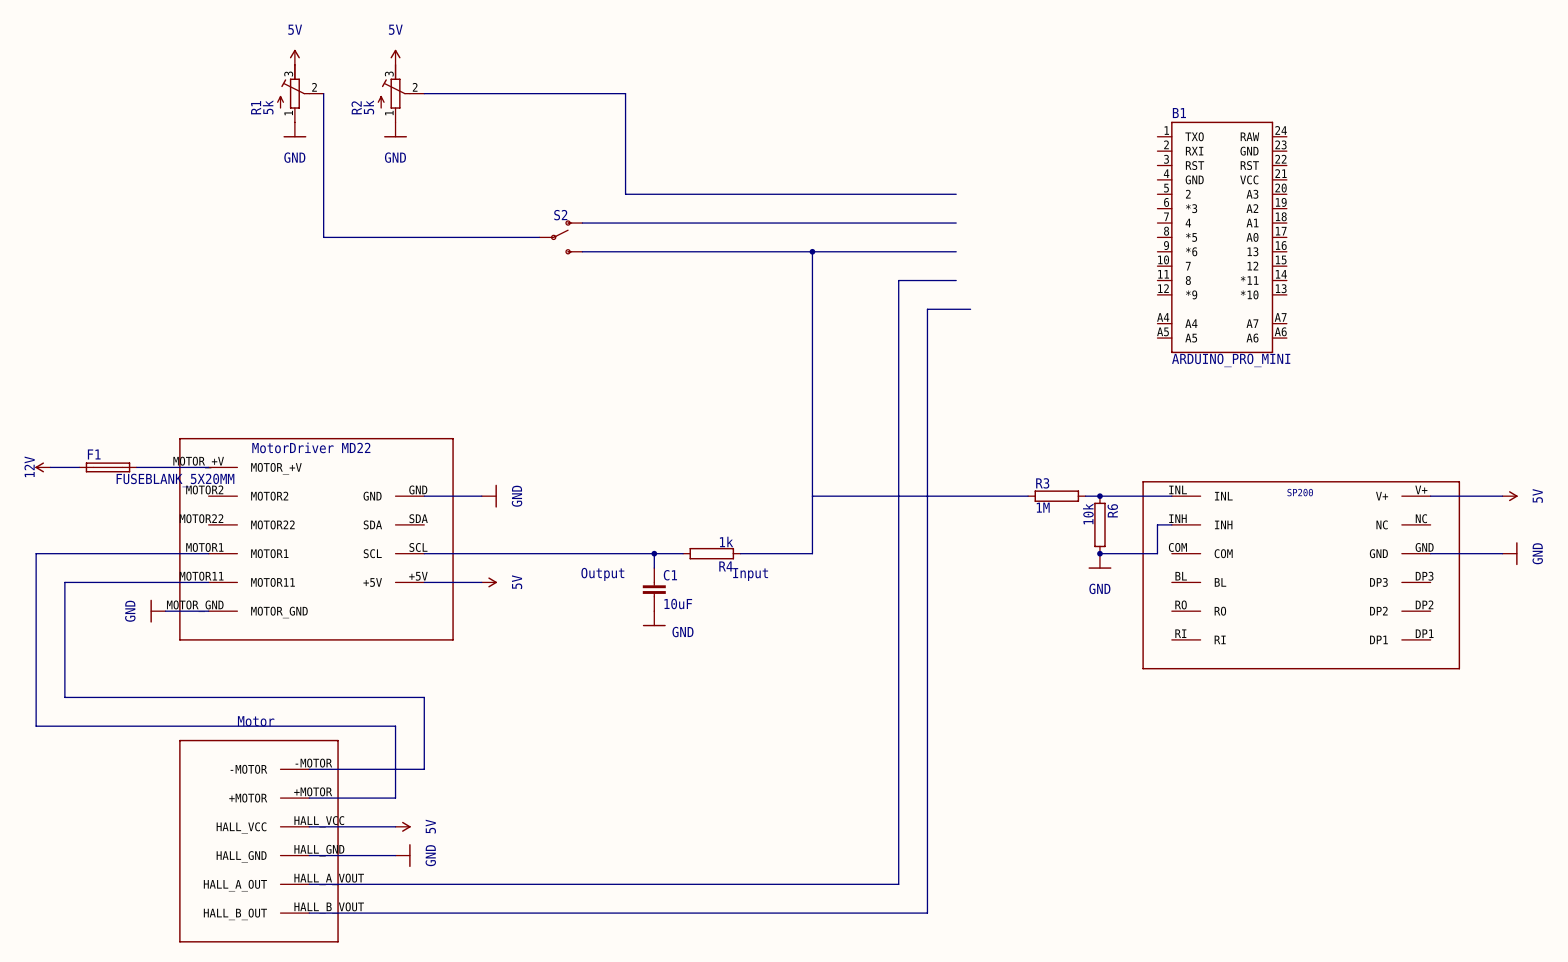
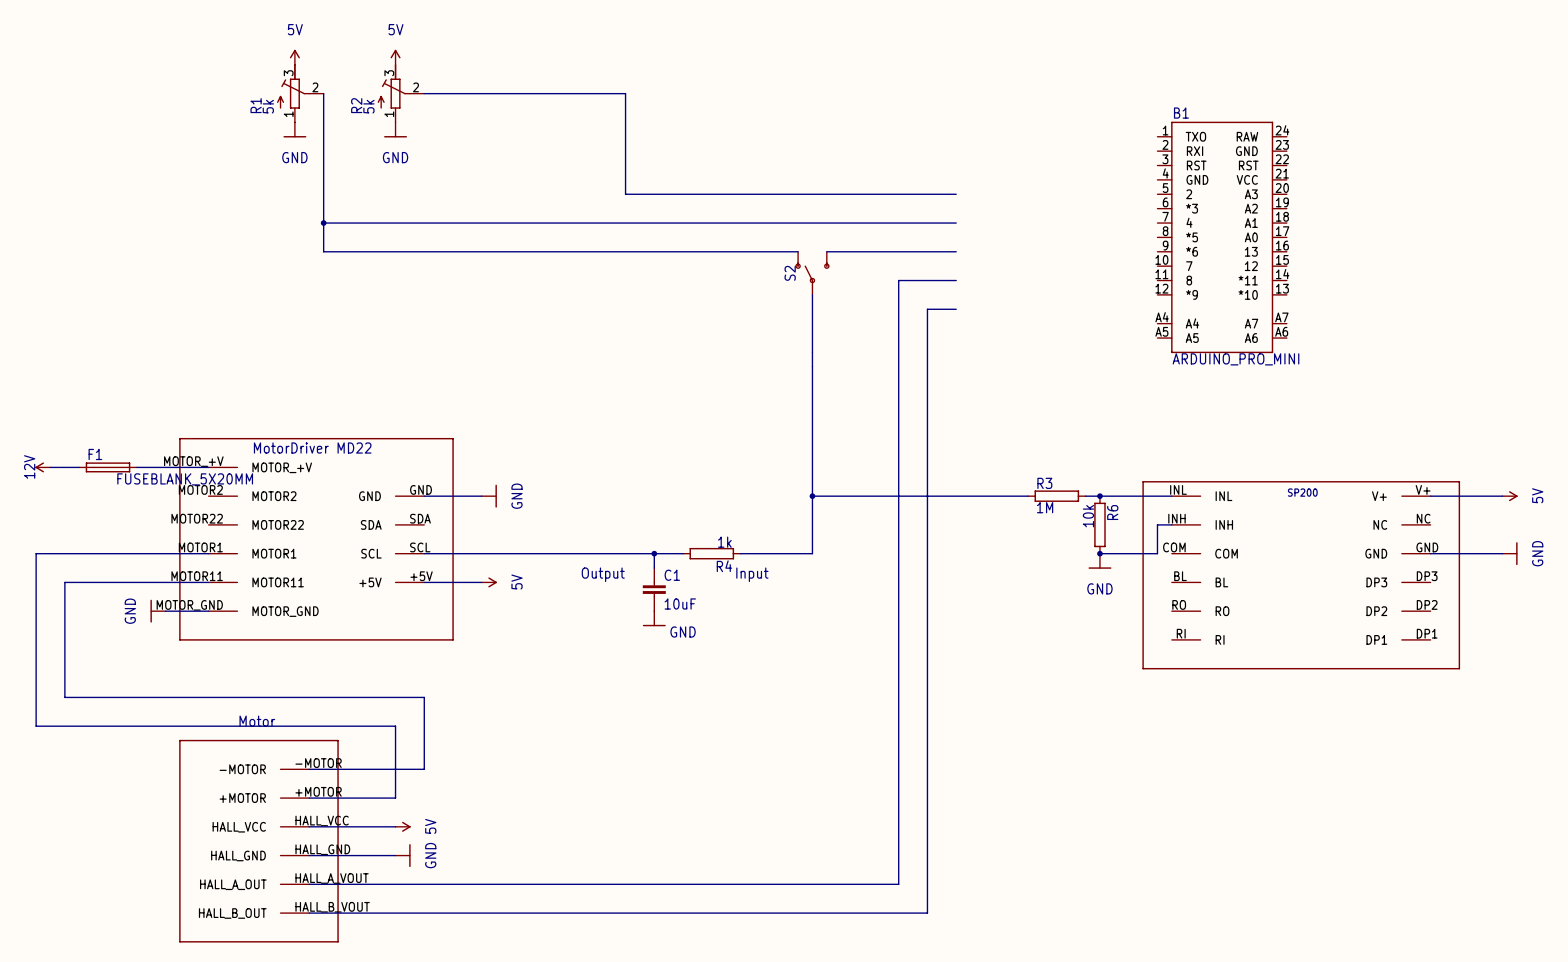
wire: none -> (323, 223) (582, 223)
junction: none -> (323, 223)
wire: (323, 237) (539, 237) -> (323, 237) (323, 251) (582, 251)
S2 position: (560, 237) -> (812, 273)
S2 rotation: 0° (561, 237) -> 90° counterclockwise (812, 272)
wire: (798, 251) (826, 251) -> none
wire: (812, 251) (812, 294) -> none
junction: (812, 251) -> none
wire: (956, 309) (970, 309) -> none
junction: none -> (812, 496)

